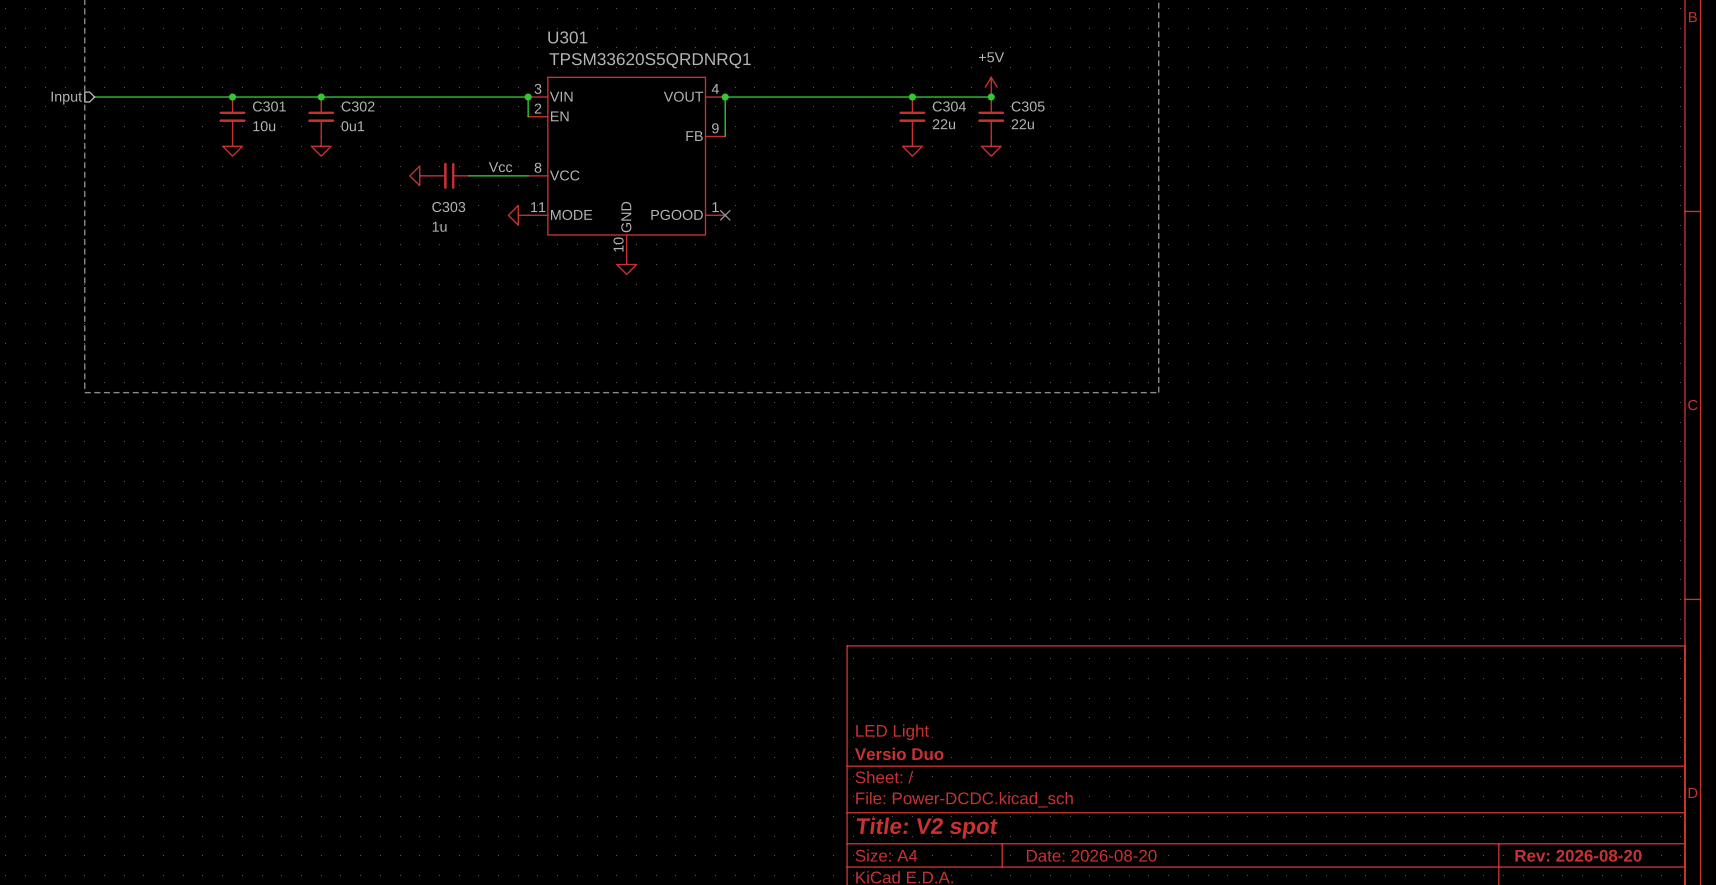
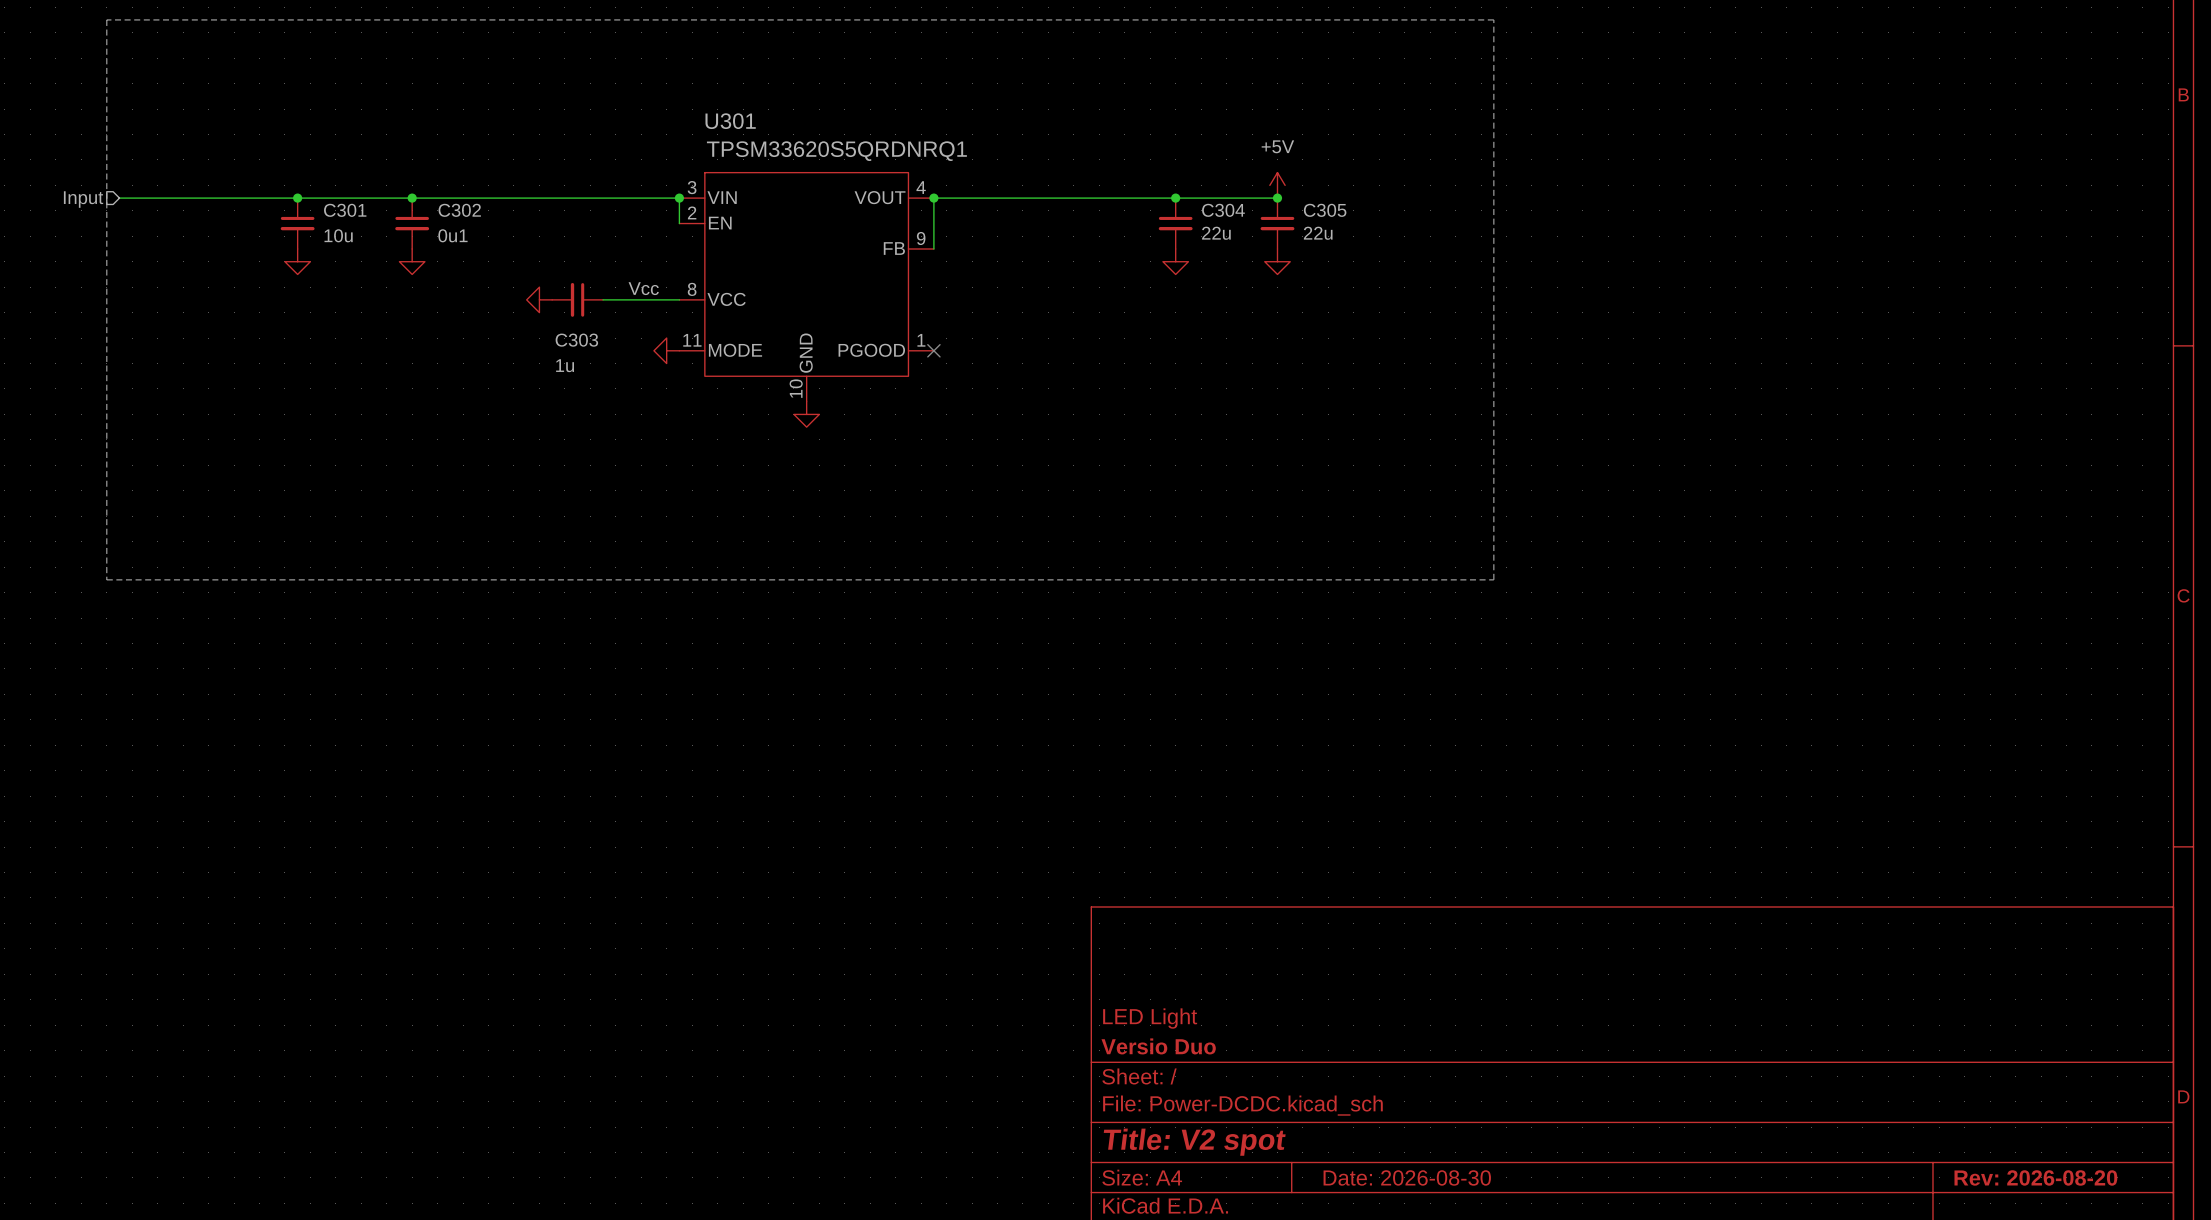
title block: Date: 2026-08-20 (1091, 855) -> Date: 2026-08-30 (1407, 1177)

